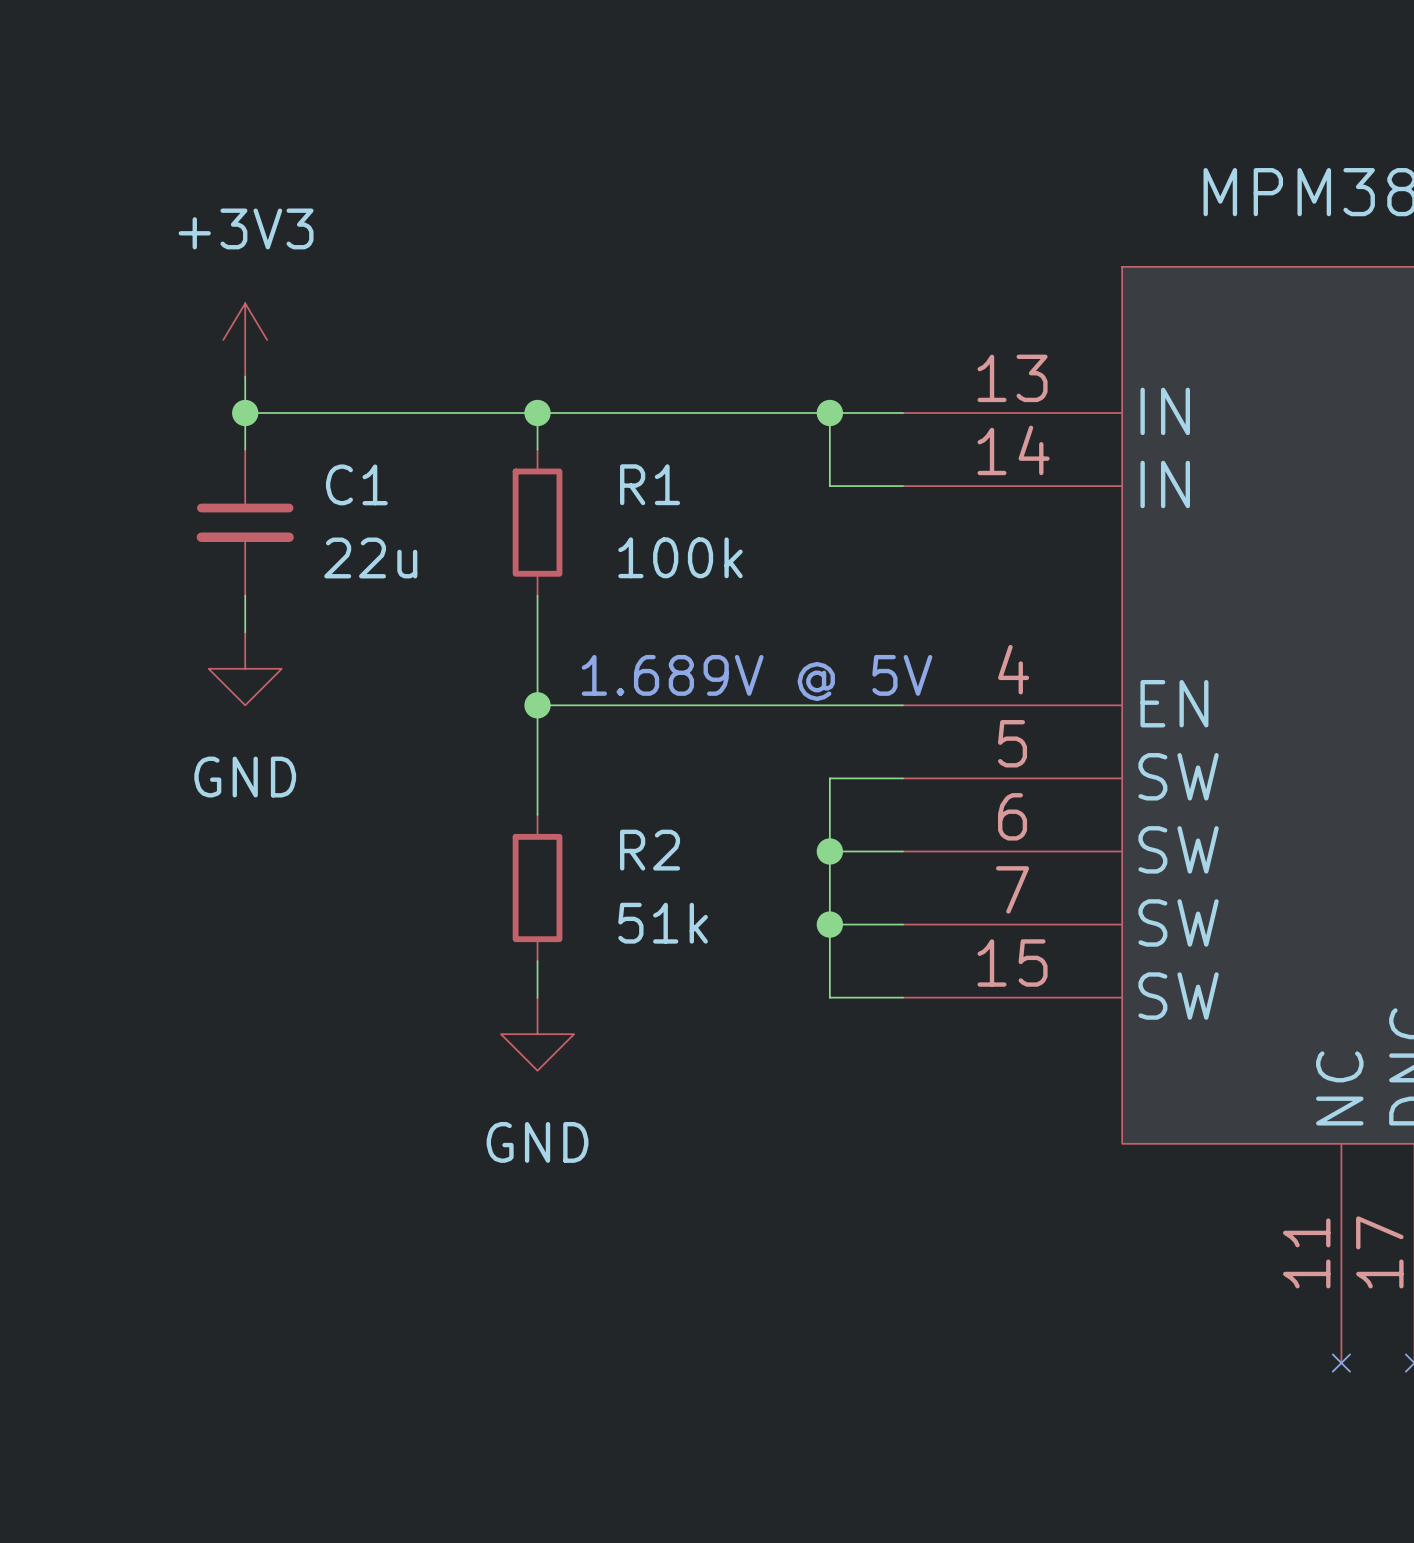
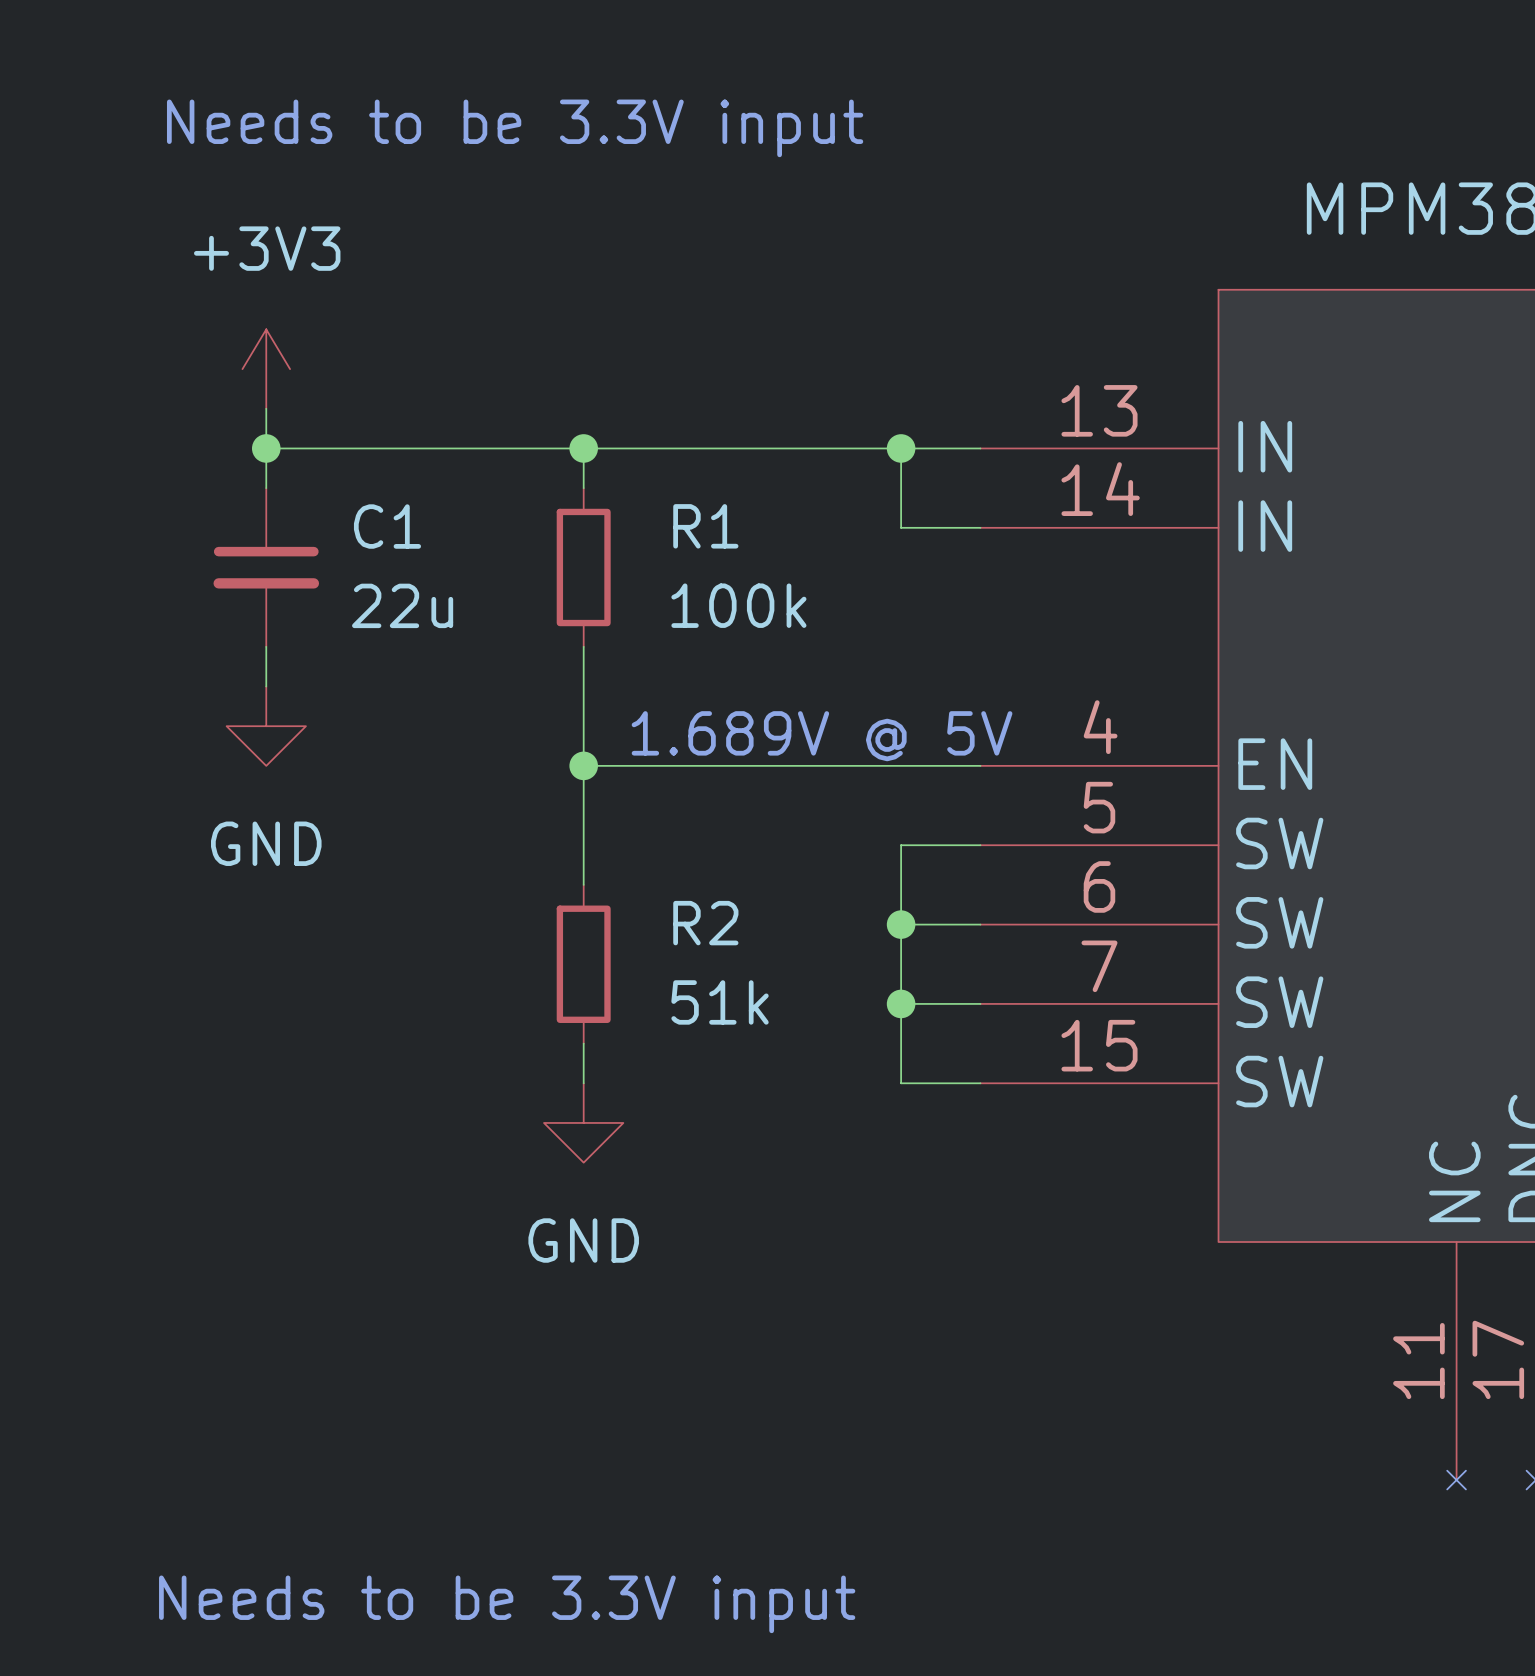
text: none -> Needs to be 3.3V input (515, 128)
text: none -> Needs to be 3.3V input (507, 1604)

